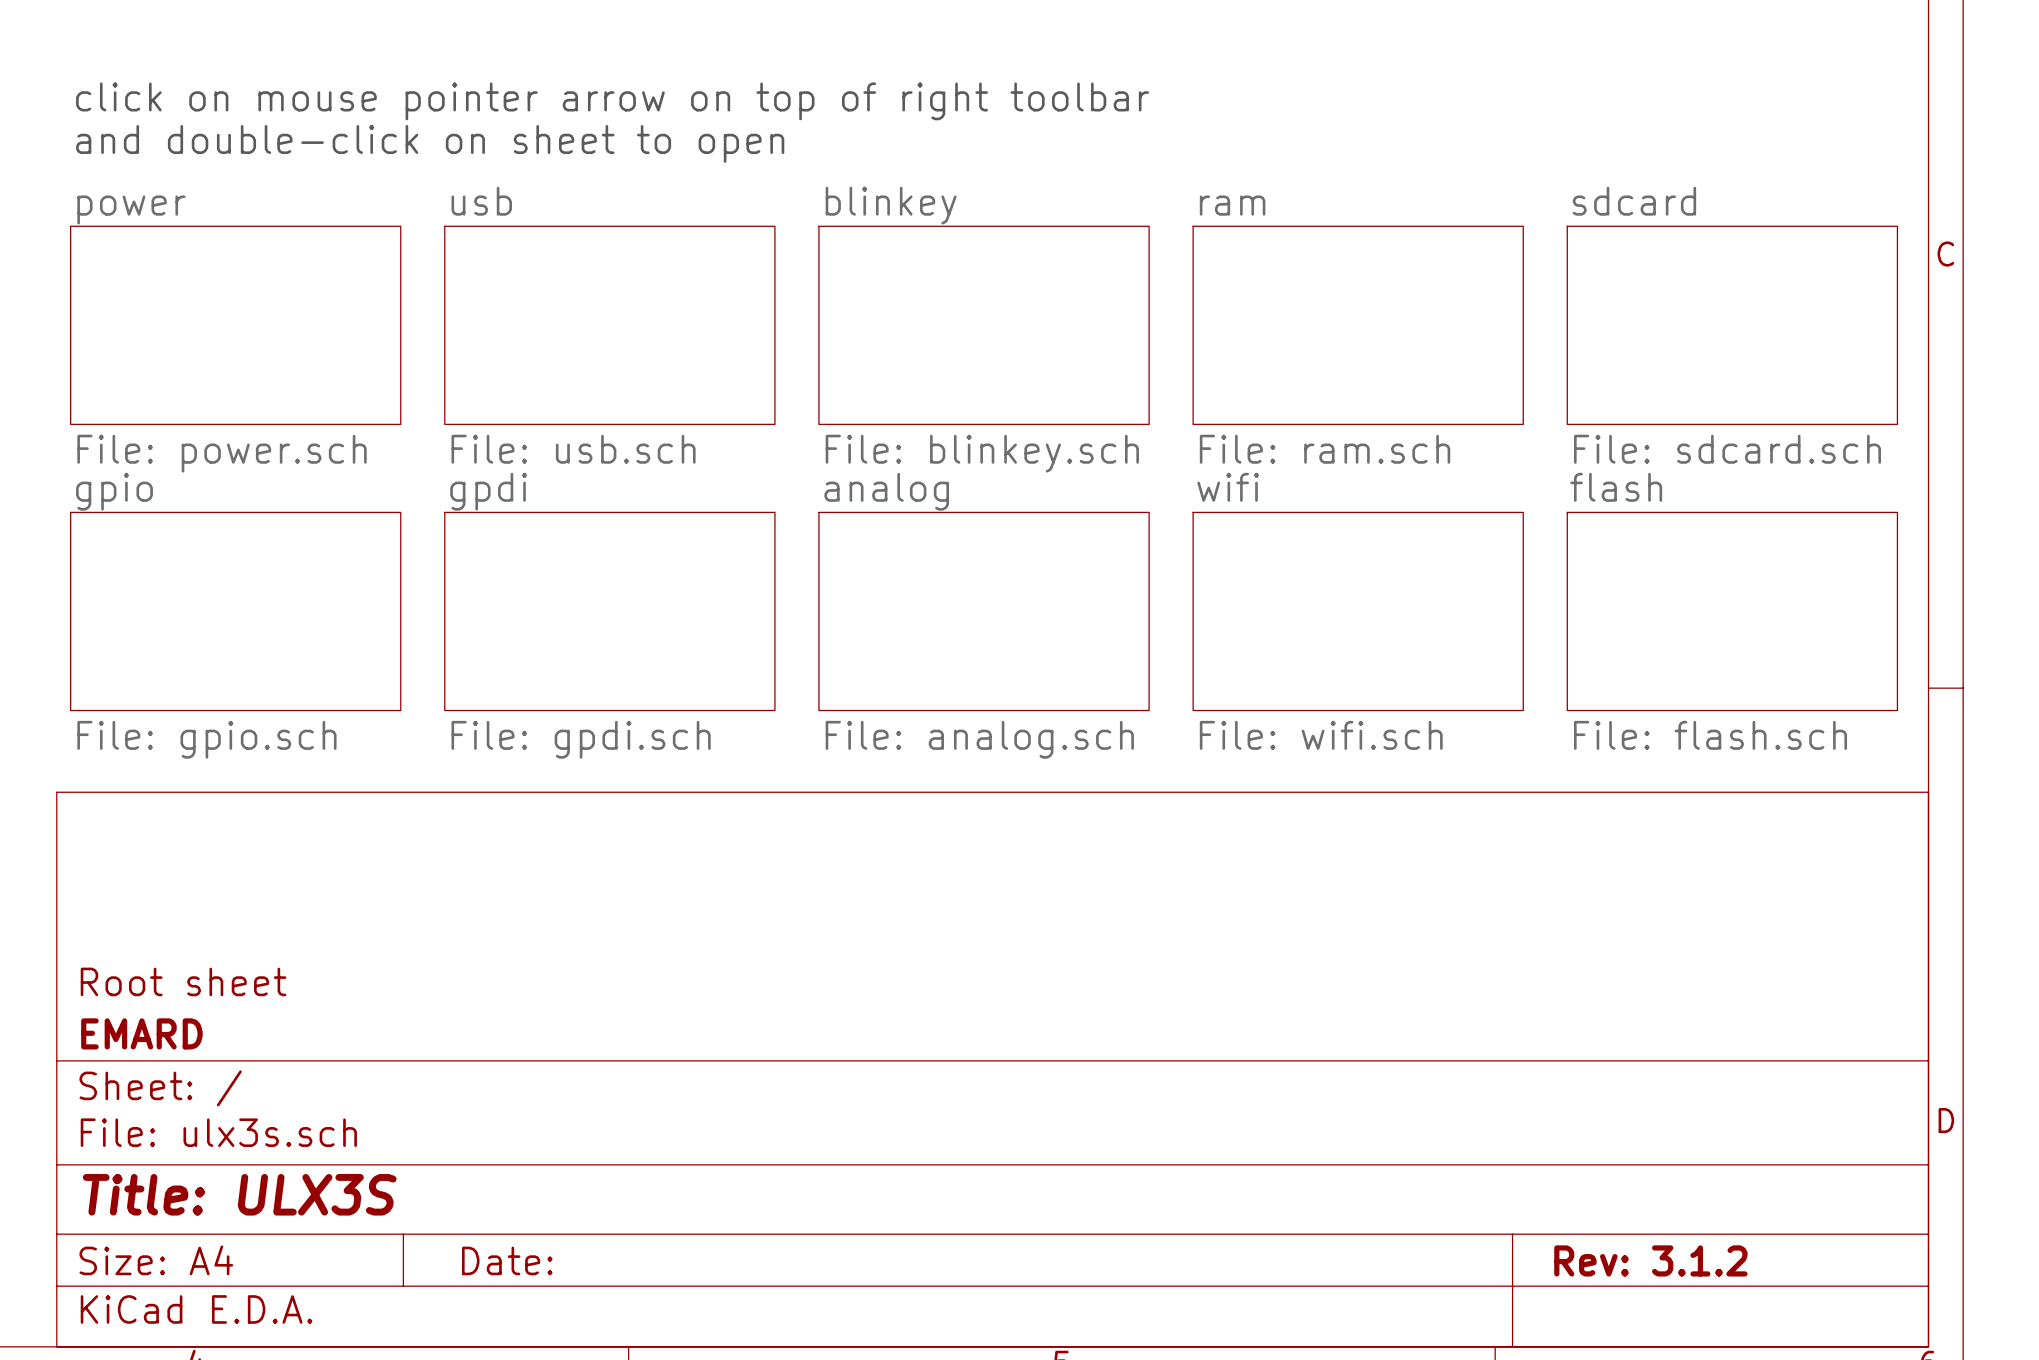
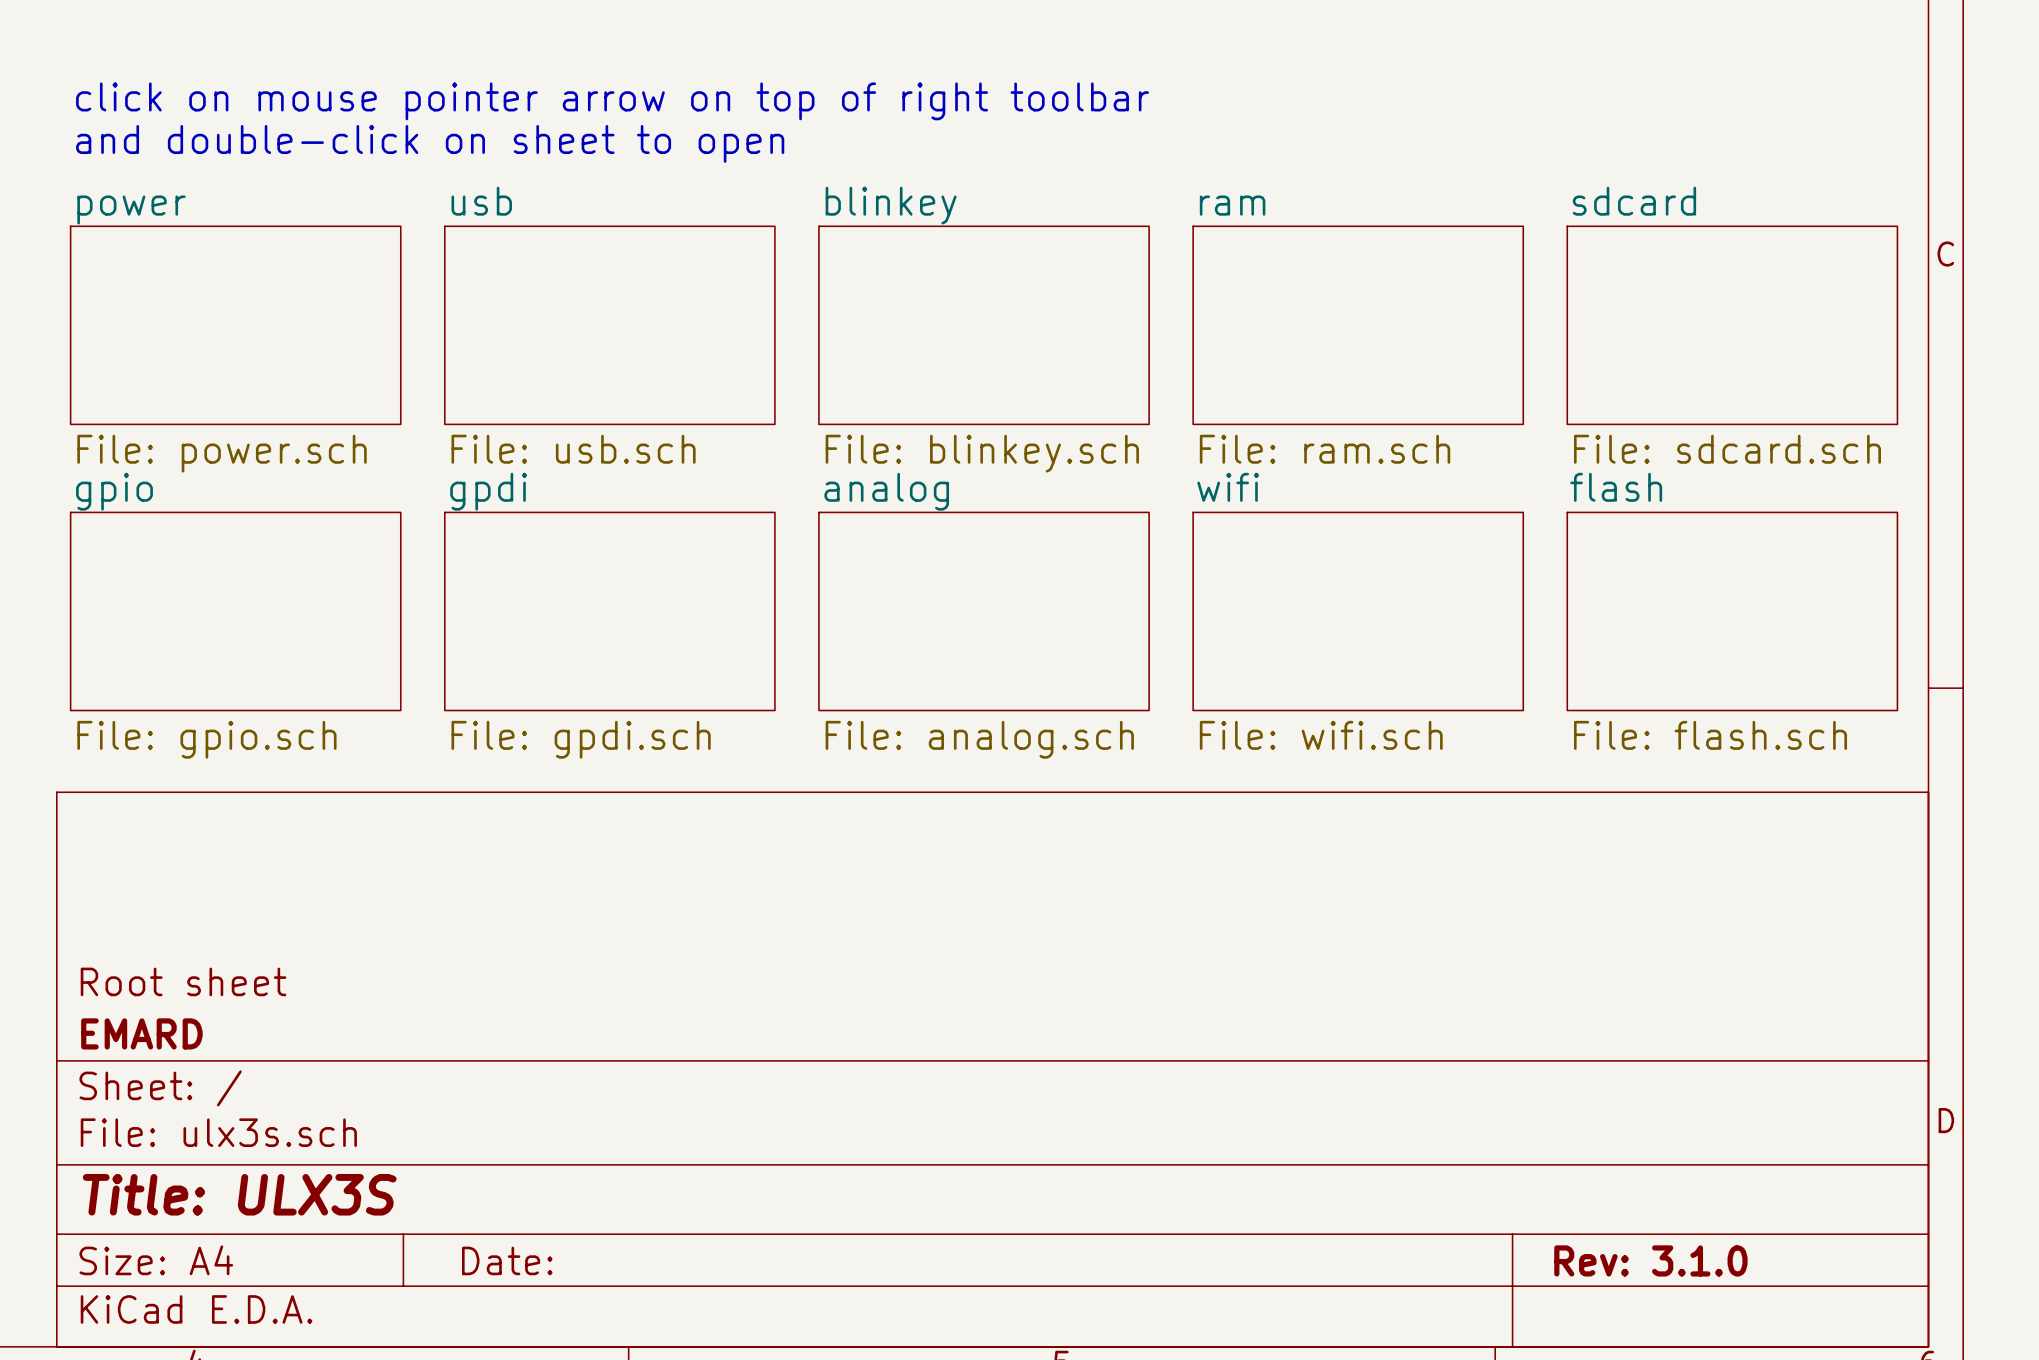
title block: Rev: 3.1.2 (1650, 1260) -> Rev: 3.1.0 (1650, 1260)

